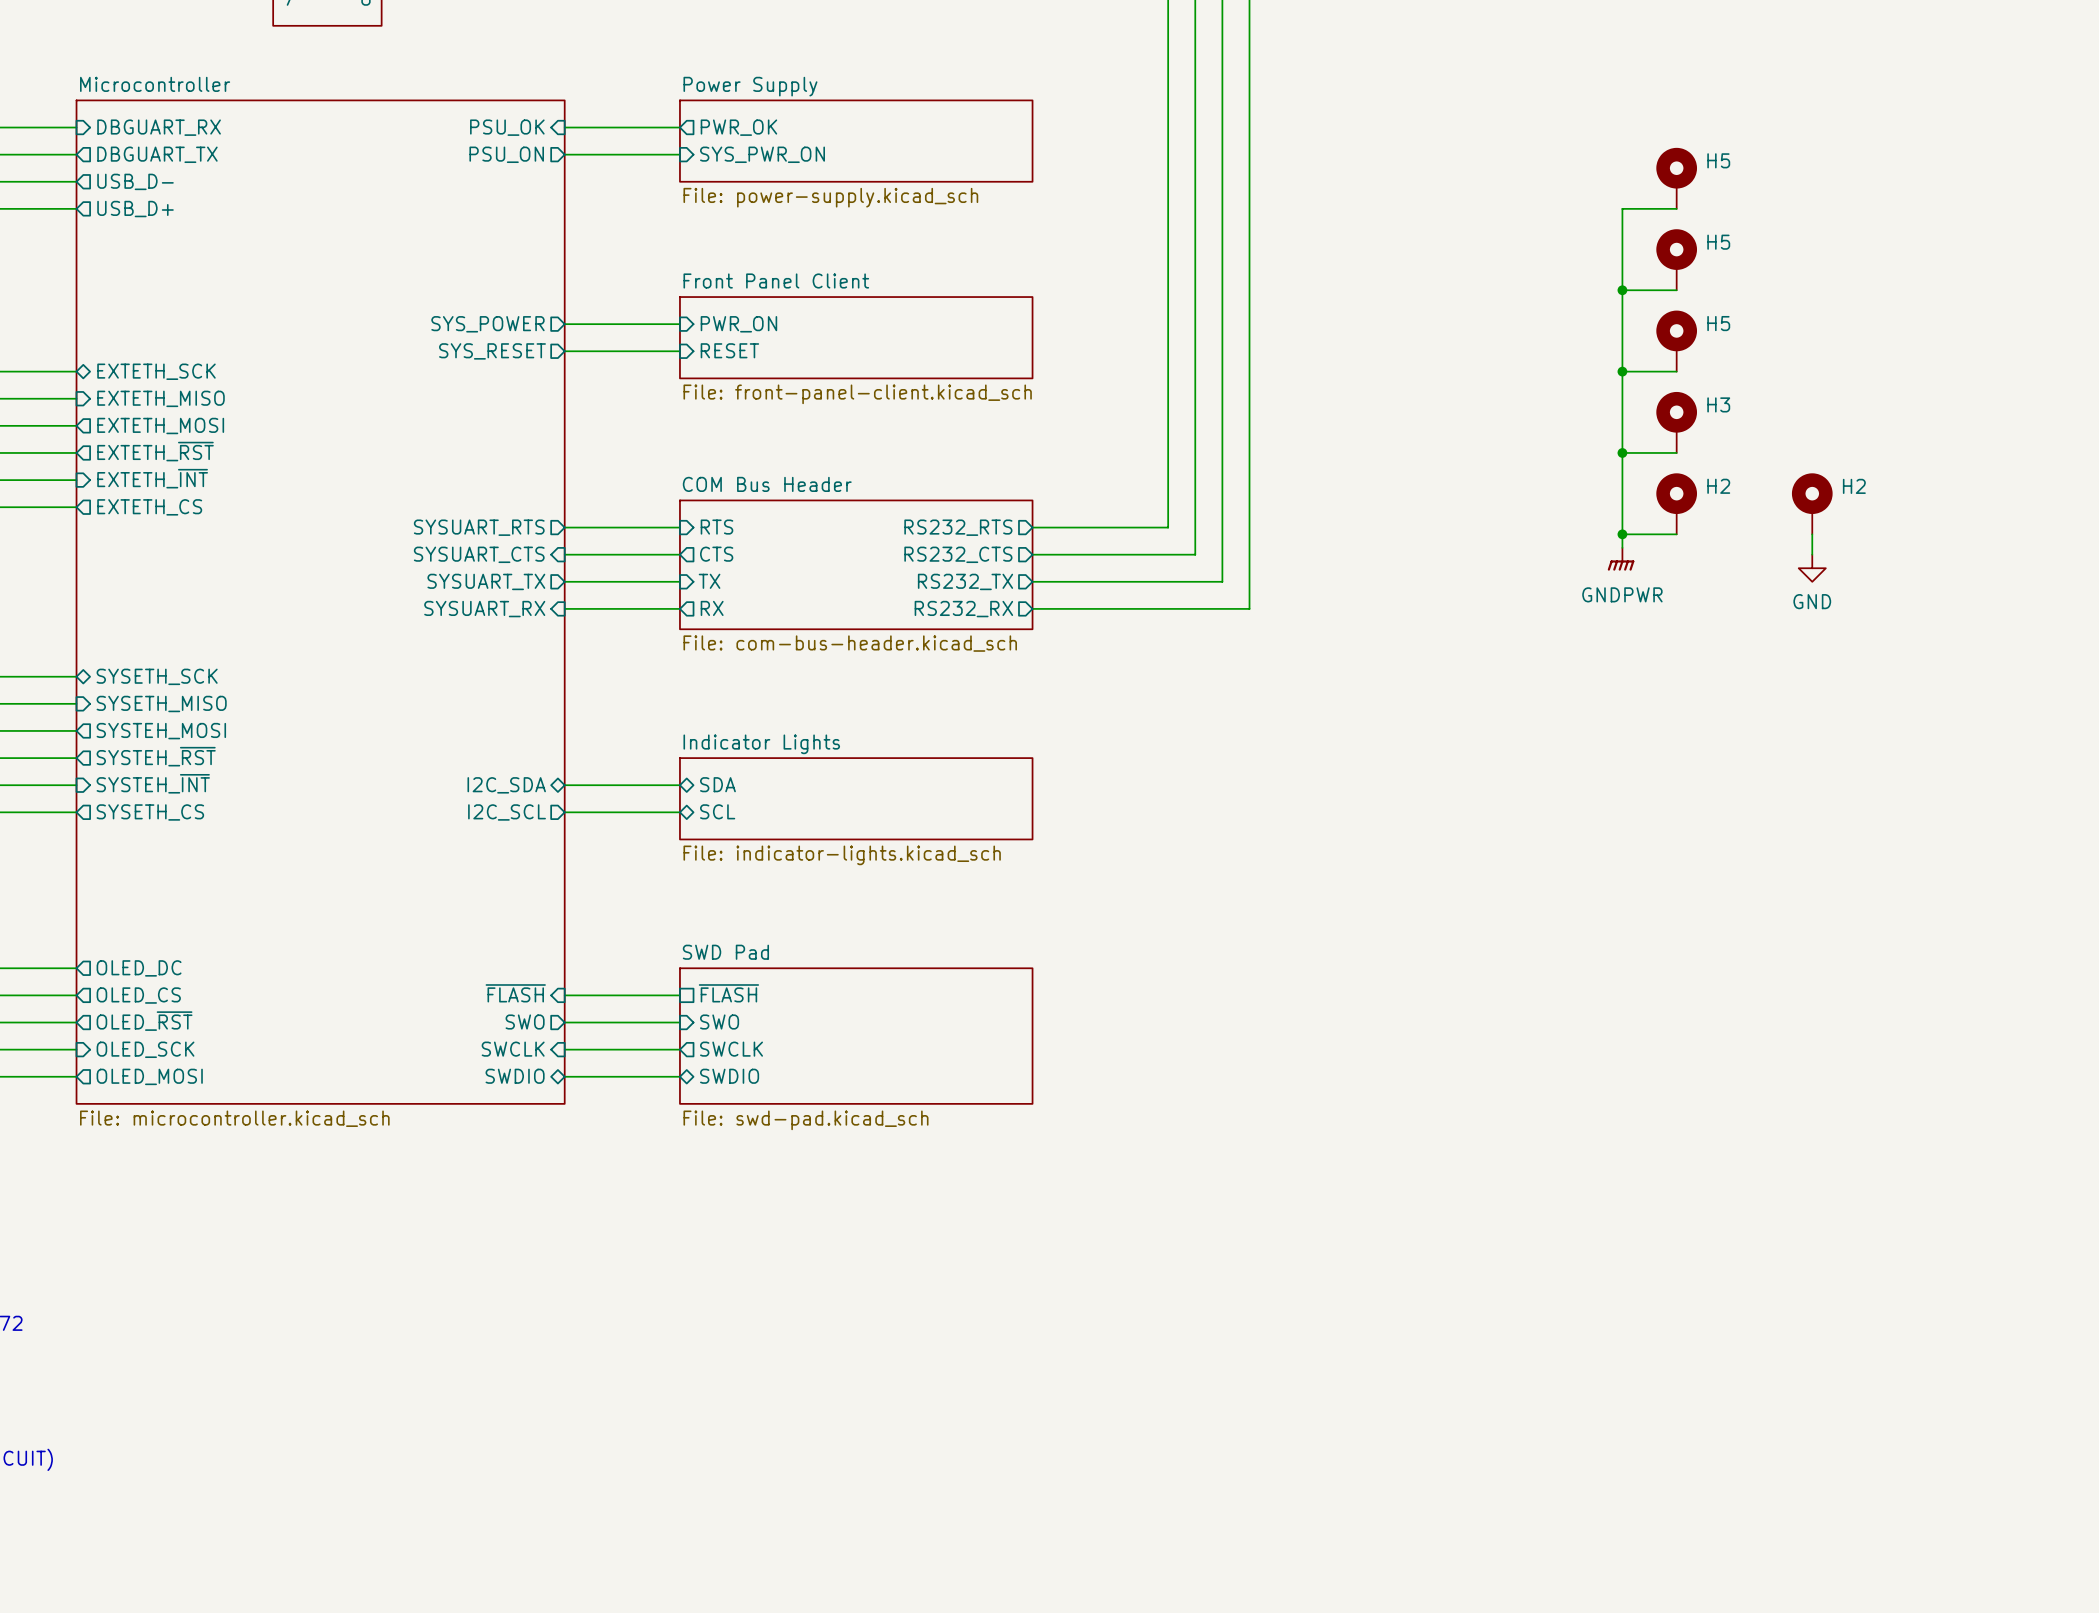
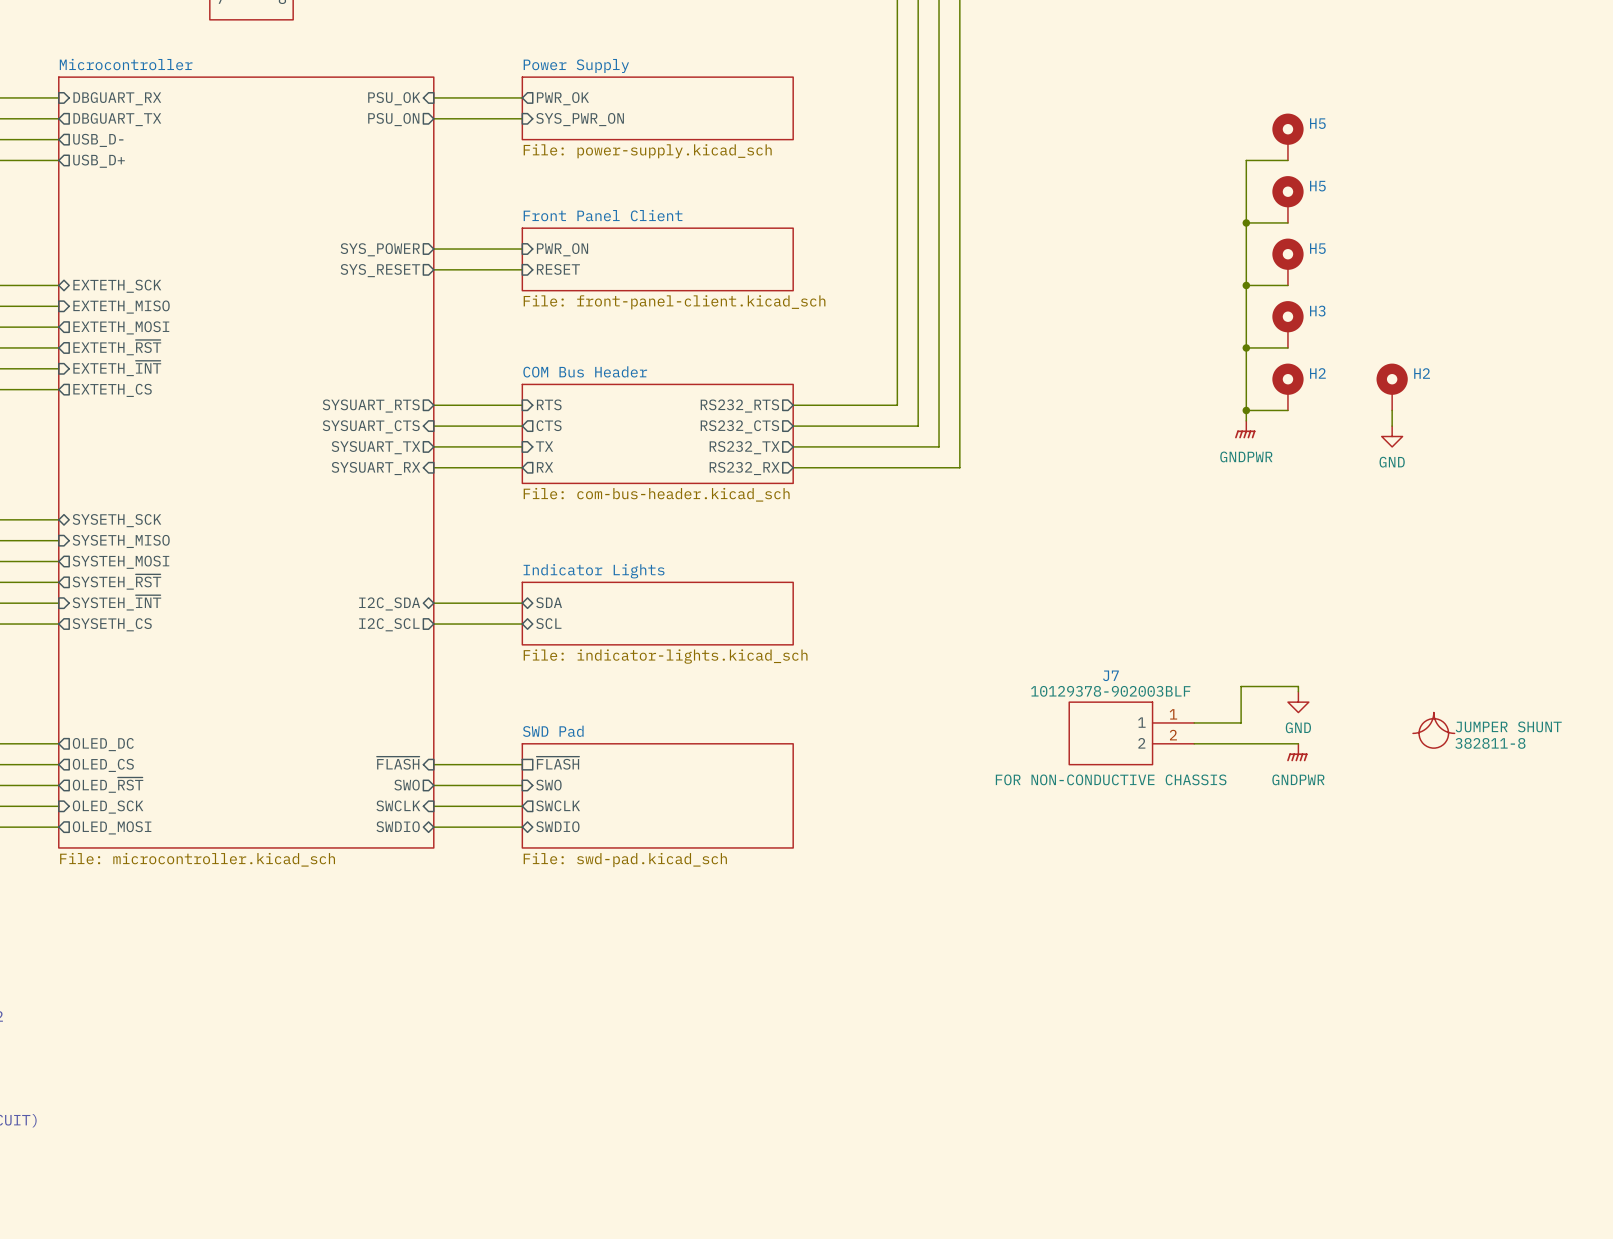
wire: none -> (1298, 691) (1298, 686) (1241, 686) (1241, 722) (1194, 722)
power symbol: none -> GND (1298, 702)
part: none -> 382811-8 (1433, 730)
J7: none -> 10129378-902003BLF (1131, 733)
wire: none -> (1194, 743) (1298, 743)
power symbol: none -> GNDPWR (1297, 752)

